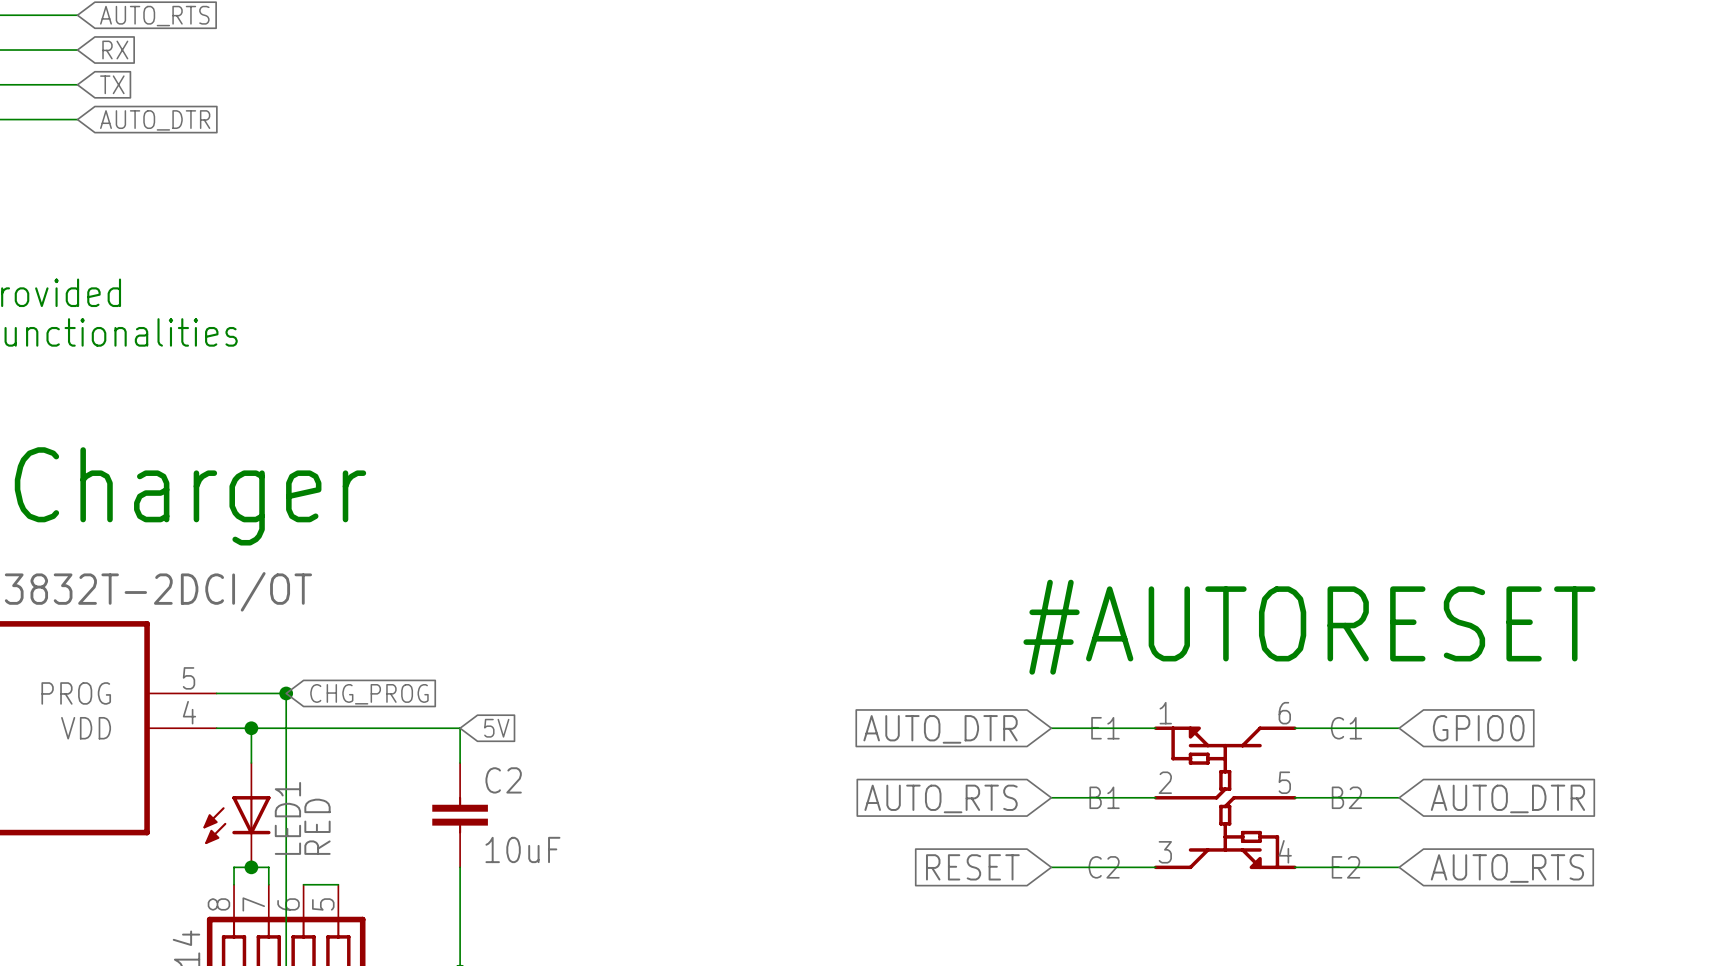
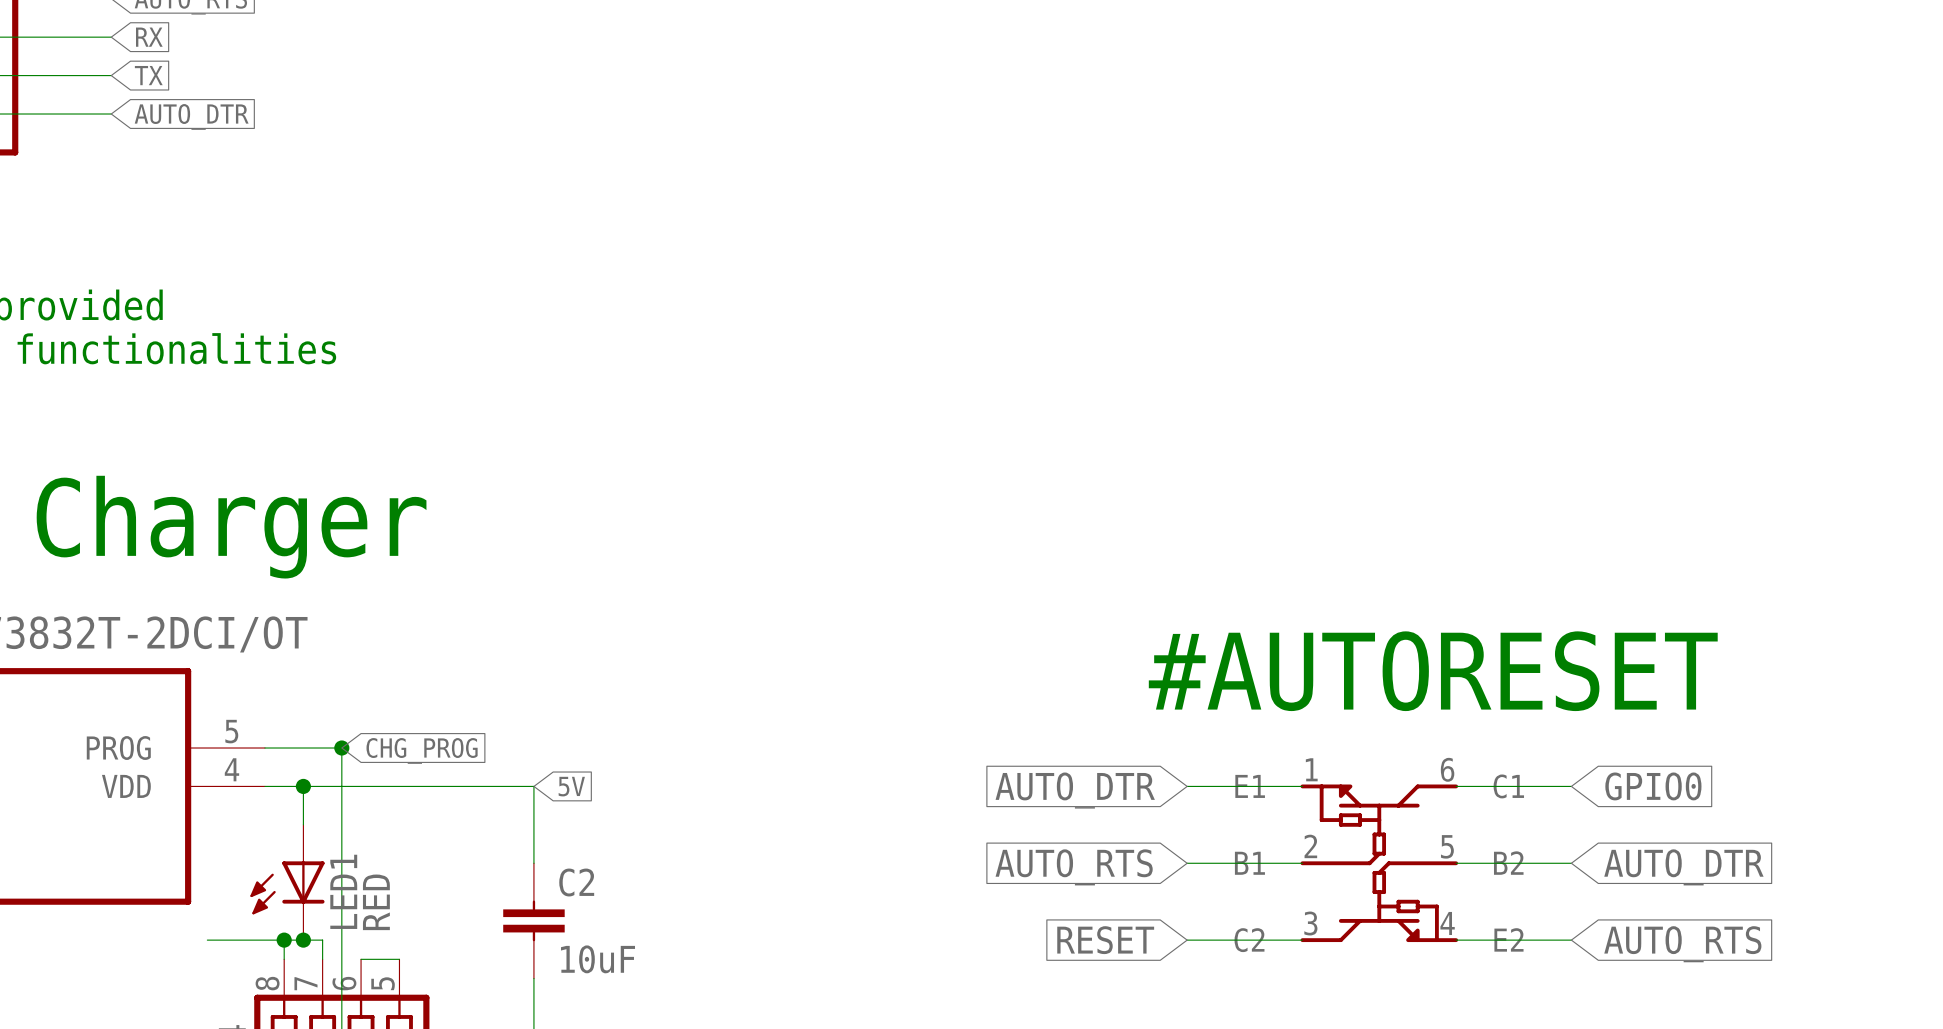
C2 position: (460, 815) -> (533, 920)
wire: none -> (207, 940) (284, 940)
junction: none -> (284, 940)

